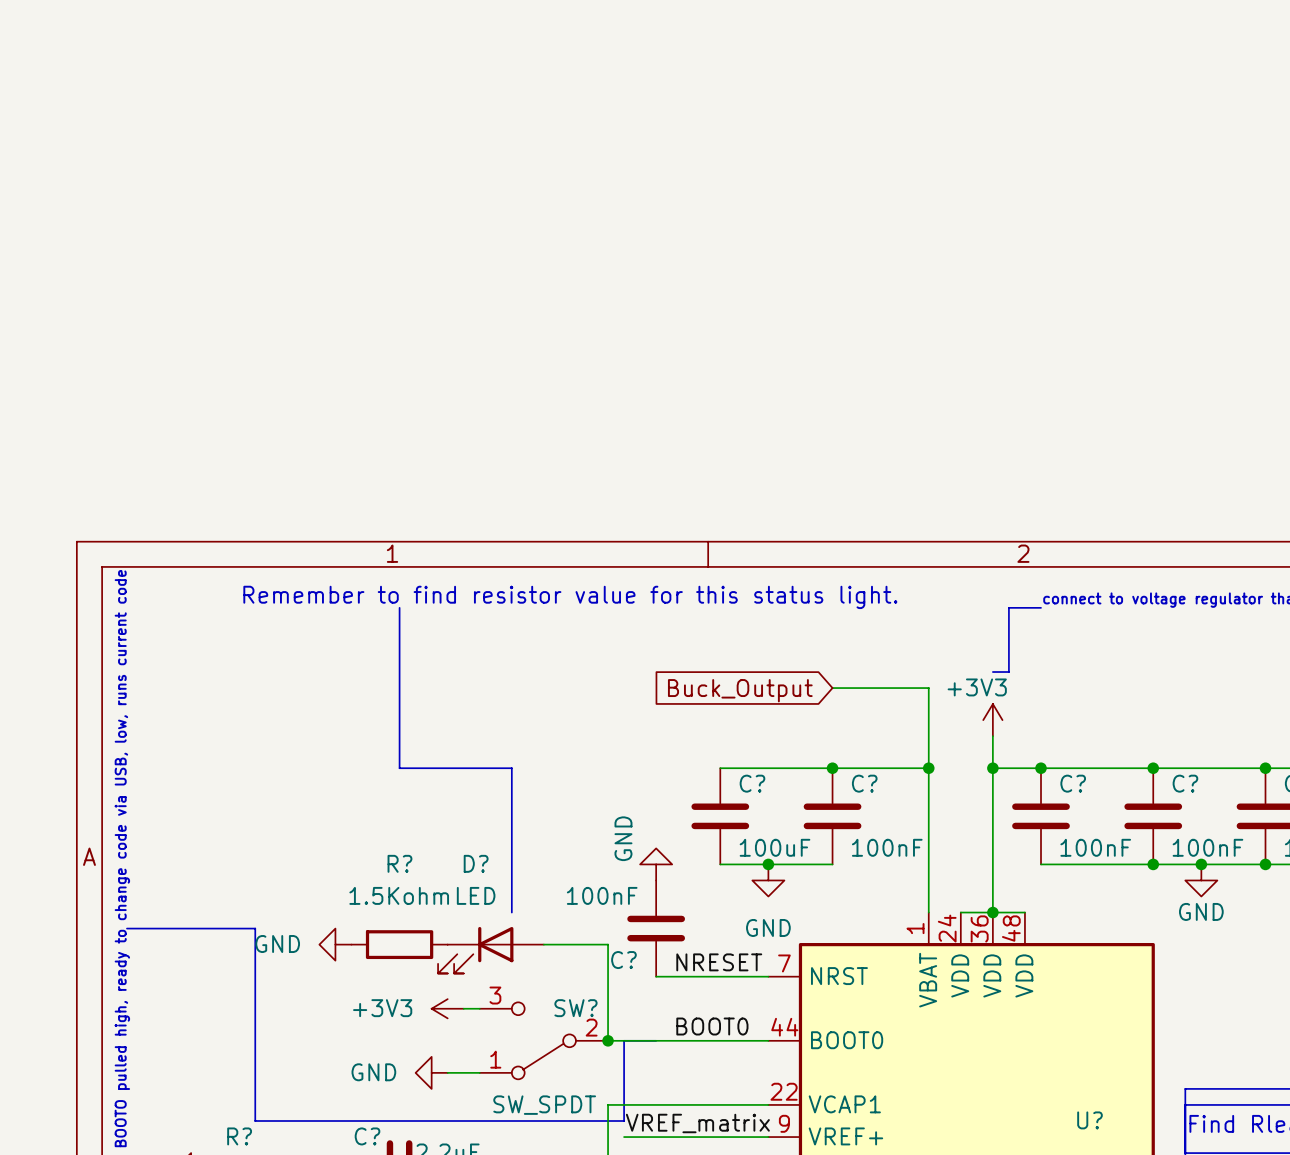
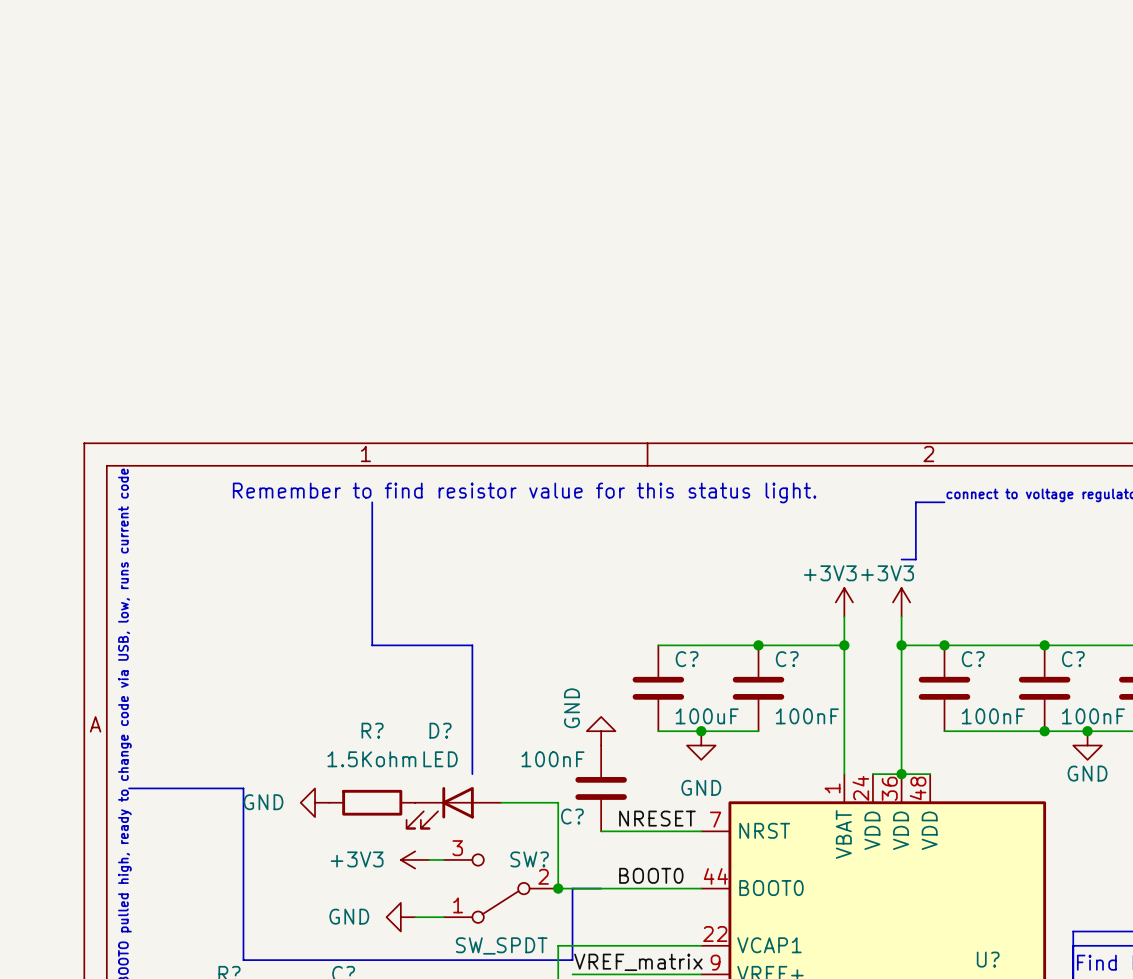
wire: (832, 688) (928, 688) (928, 736) -> none
global label: Buck_Output (740, 690) -> none
power symbol: none -> +3V3 (844, 602)

